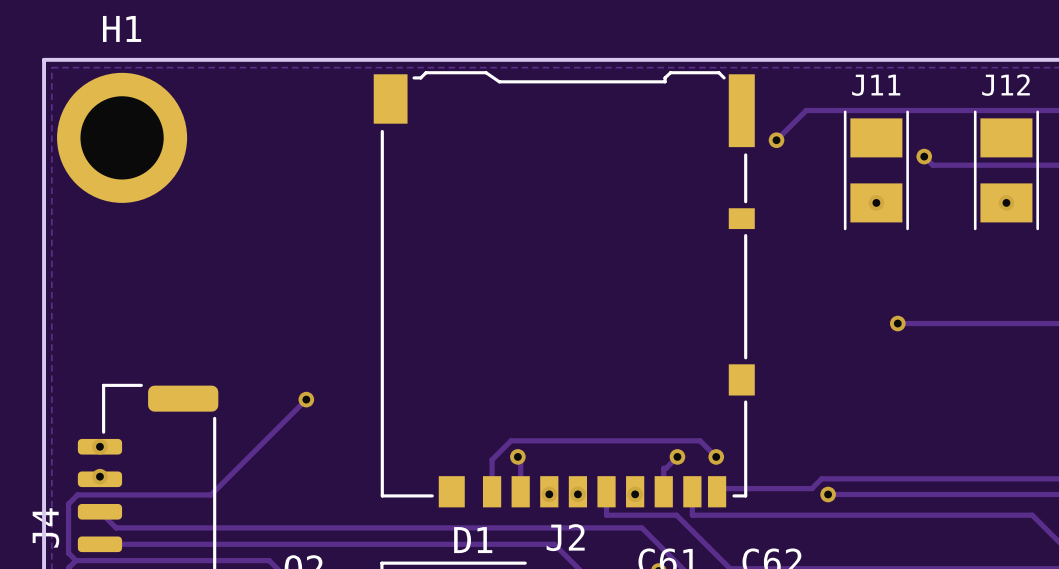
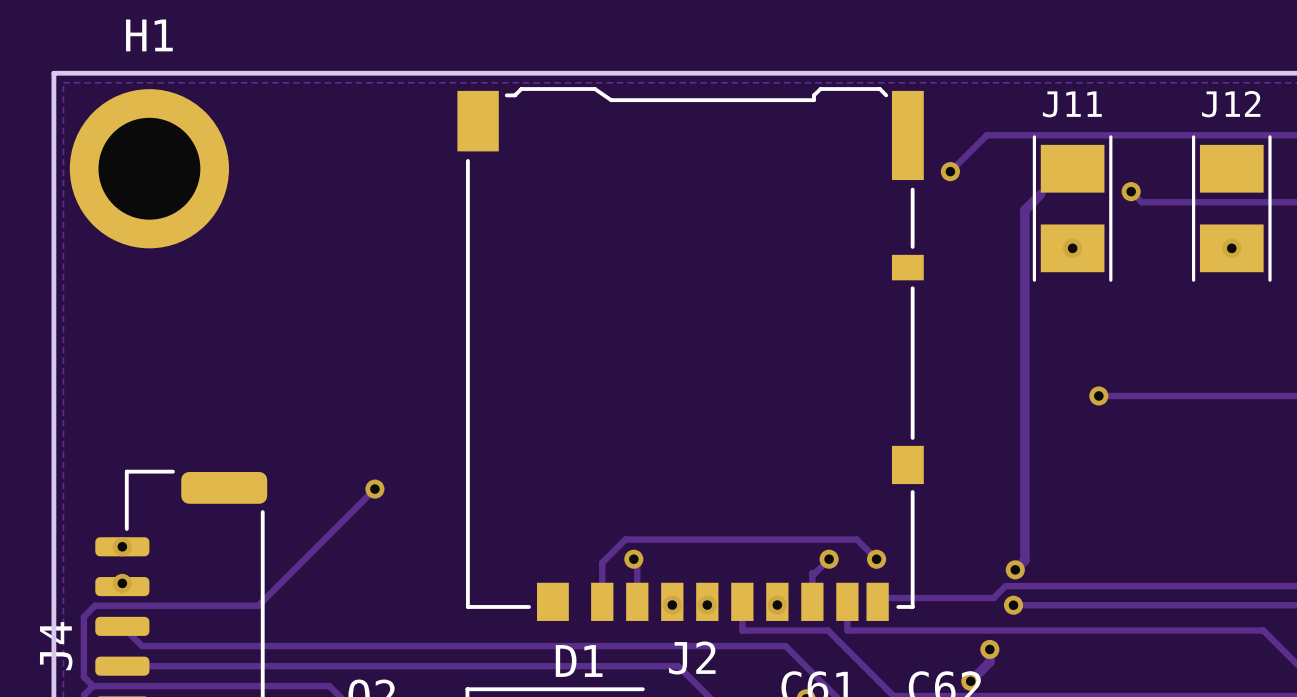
track: none -> (1040, 194) (1024, 210) (1024, 560) (1015, 569)
via: none -> (1015, 569)
track: none -> (989, 649) (989, 662) (970, 681)
via: none -> (989, 649)
via: none -> (970, 681)

